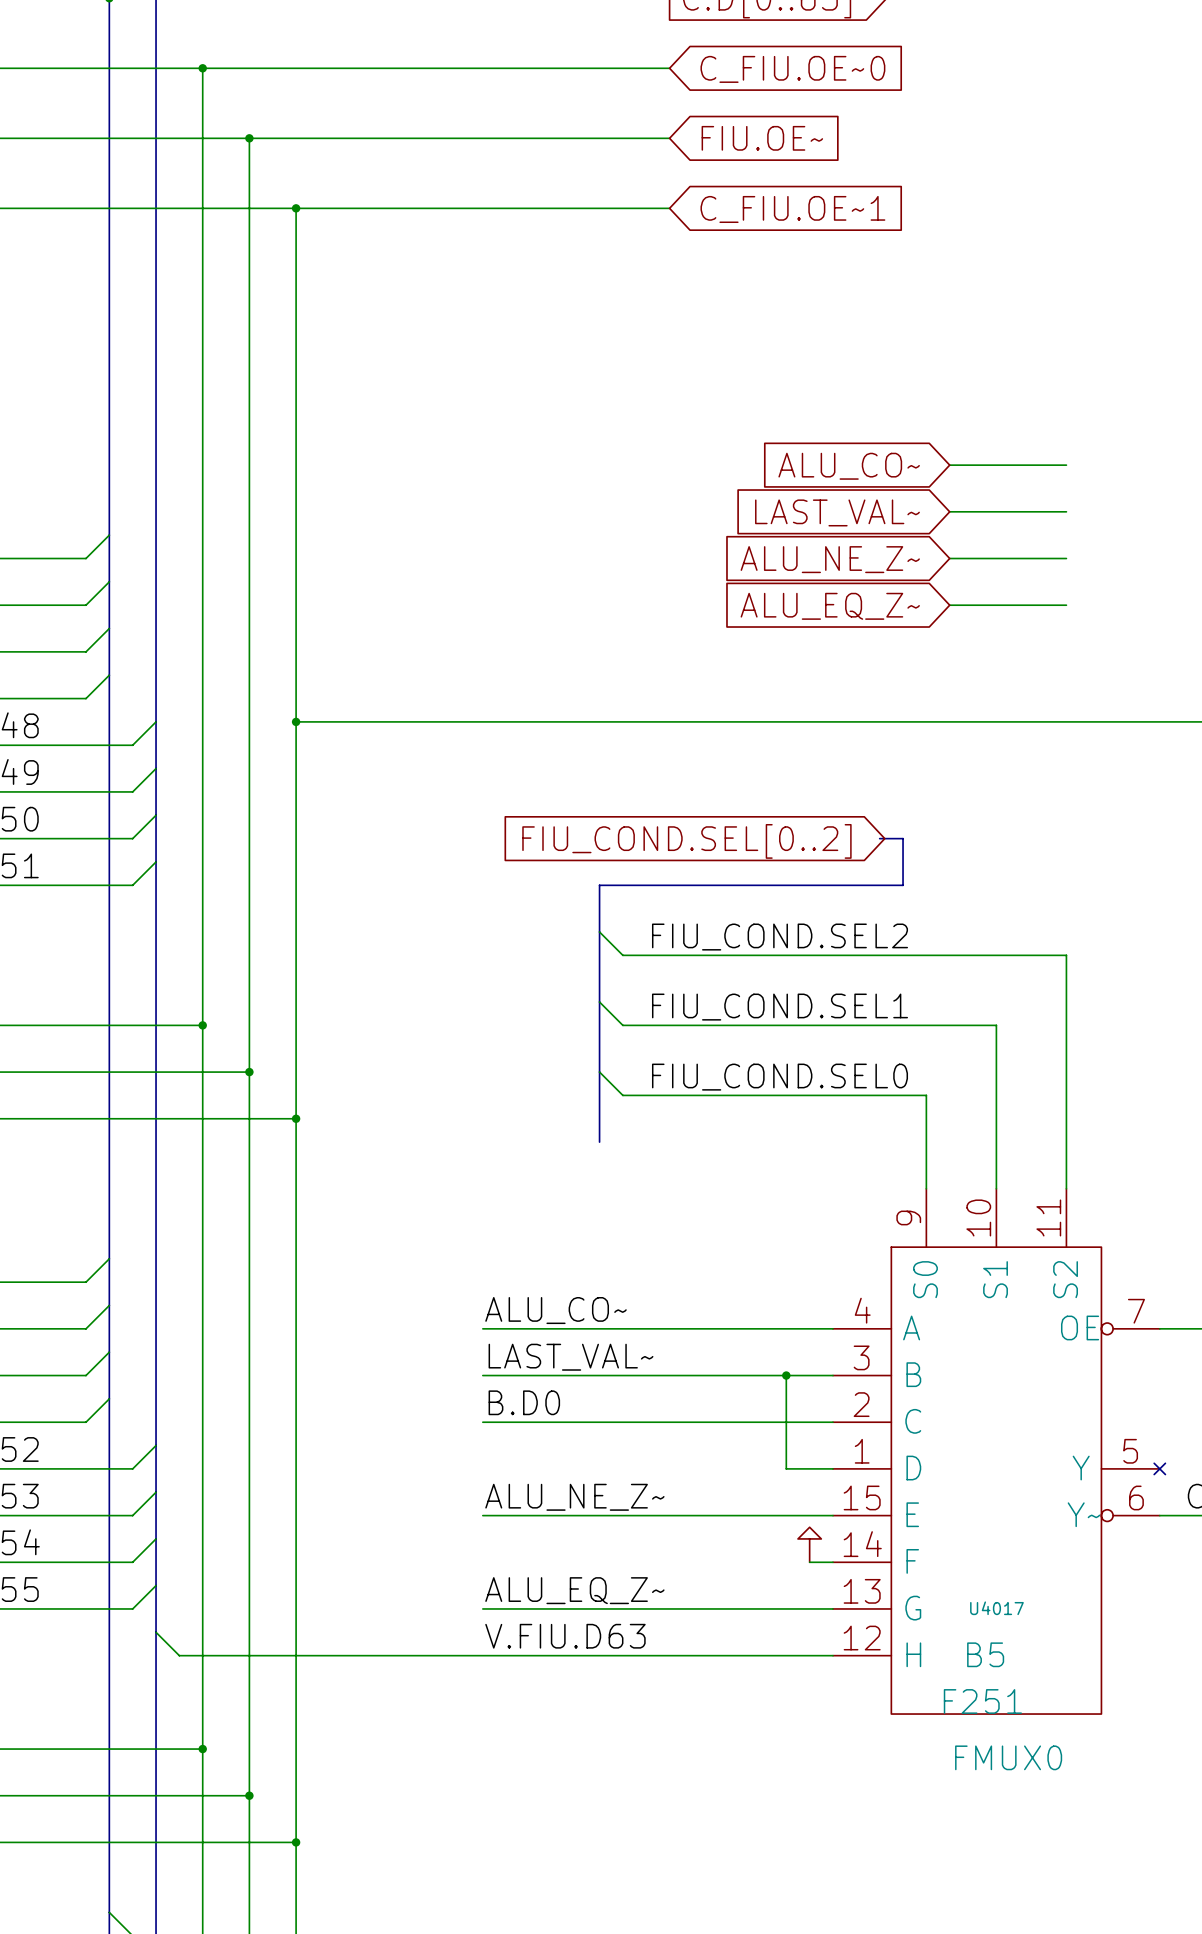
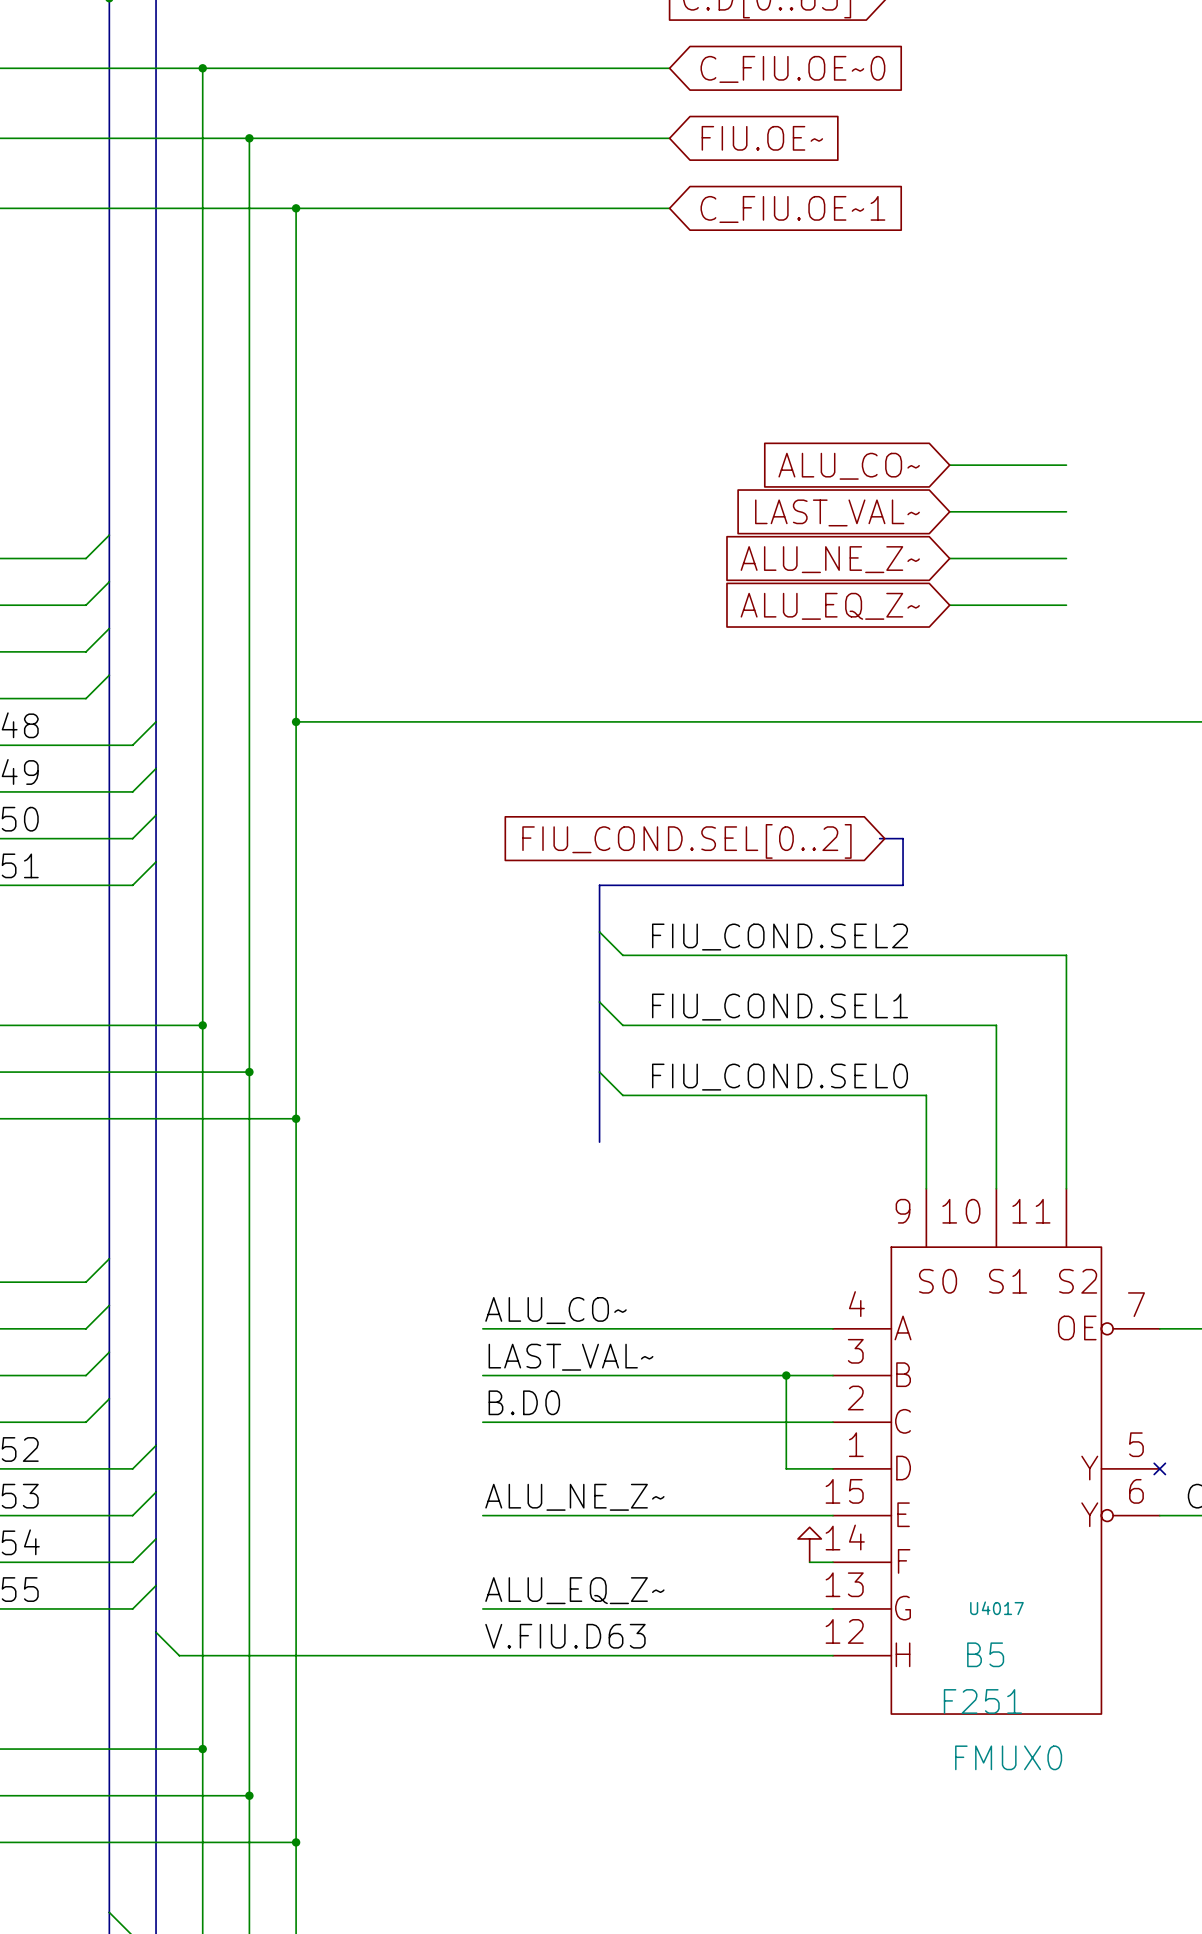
U4017 symbol: [832, 1188, 1160, 1715] -> [832, 1188, 1160, 1715]

